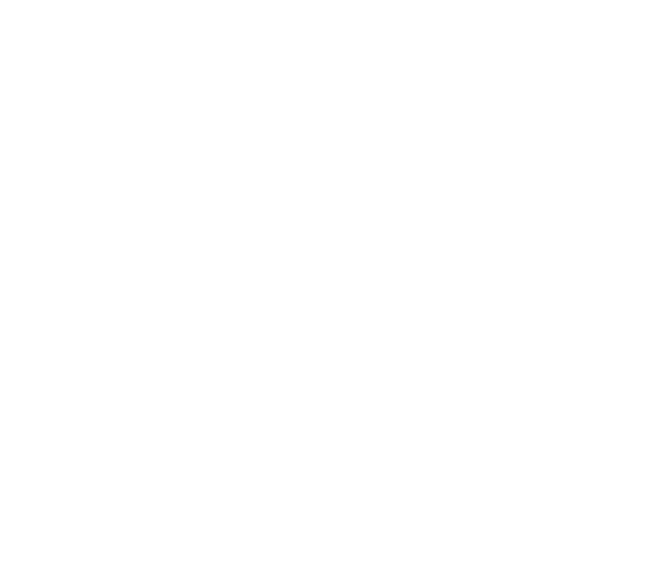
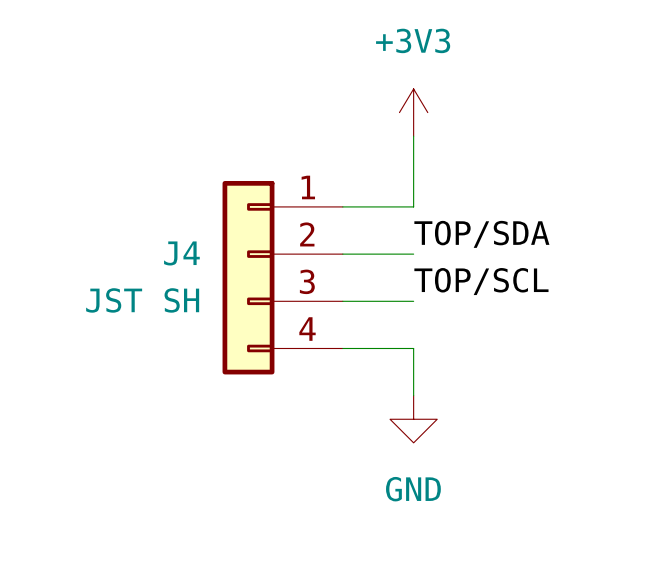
power symbol: none -> +3V3 (413, 112)
wire: none -> (413, 136) (413, 206) (342, 206)
label: none -> TOP/SDA (481, 234)
wire: none -> (342, 254) (413, 254)
J4: none -> JST SH (282, 277)
label: none -> TOP/SCL (481, 281)
wire: none -> (342, 301) (413, 301)
wire: none -> (342, 348) (413, 348) (413, 395)
power symbol: none -> GND (413, 419)

